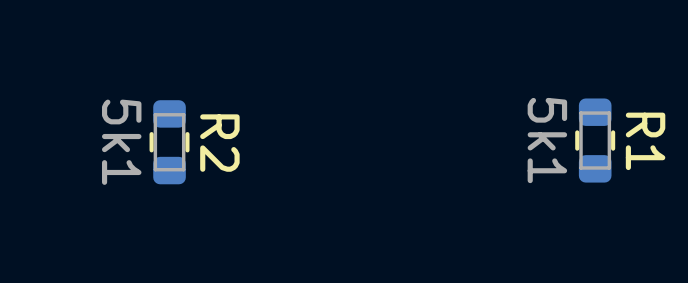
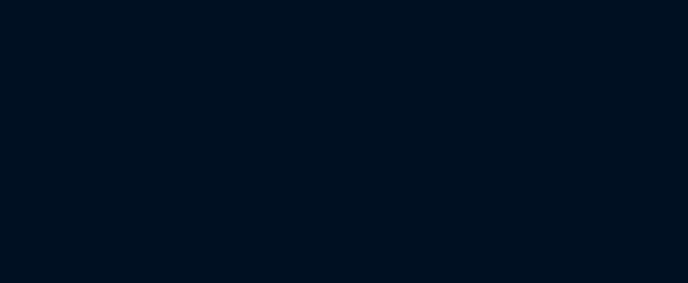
R1: 5k1 (595, 140) -> none
R2: 5k1 (169, 142) -> none

